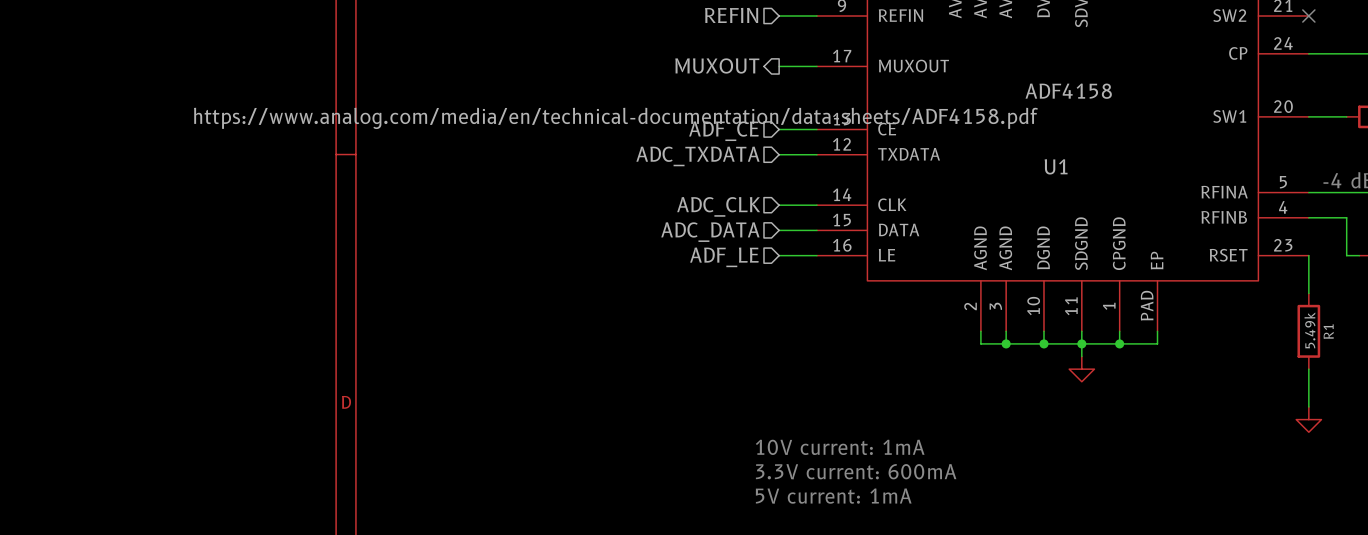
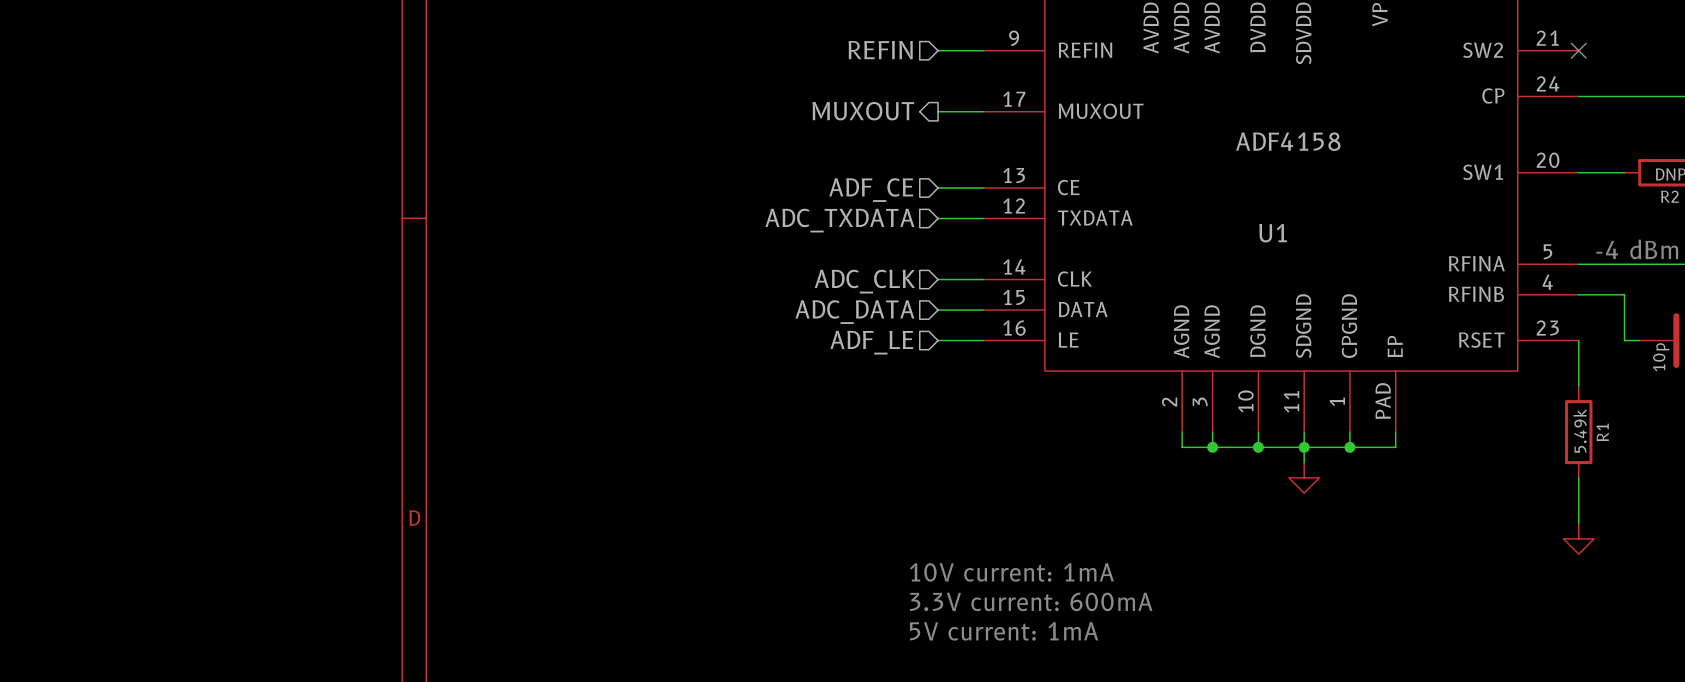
U1 text: https://www.analog.com/media/en/technical-documentation/data-sheets/ADF4158.pdf (615, 118) -> none

